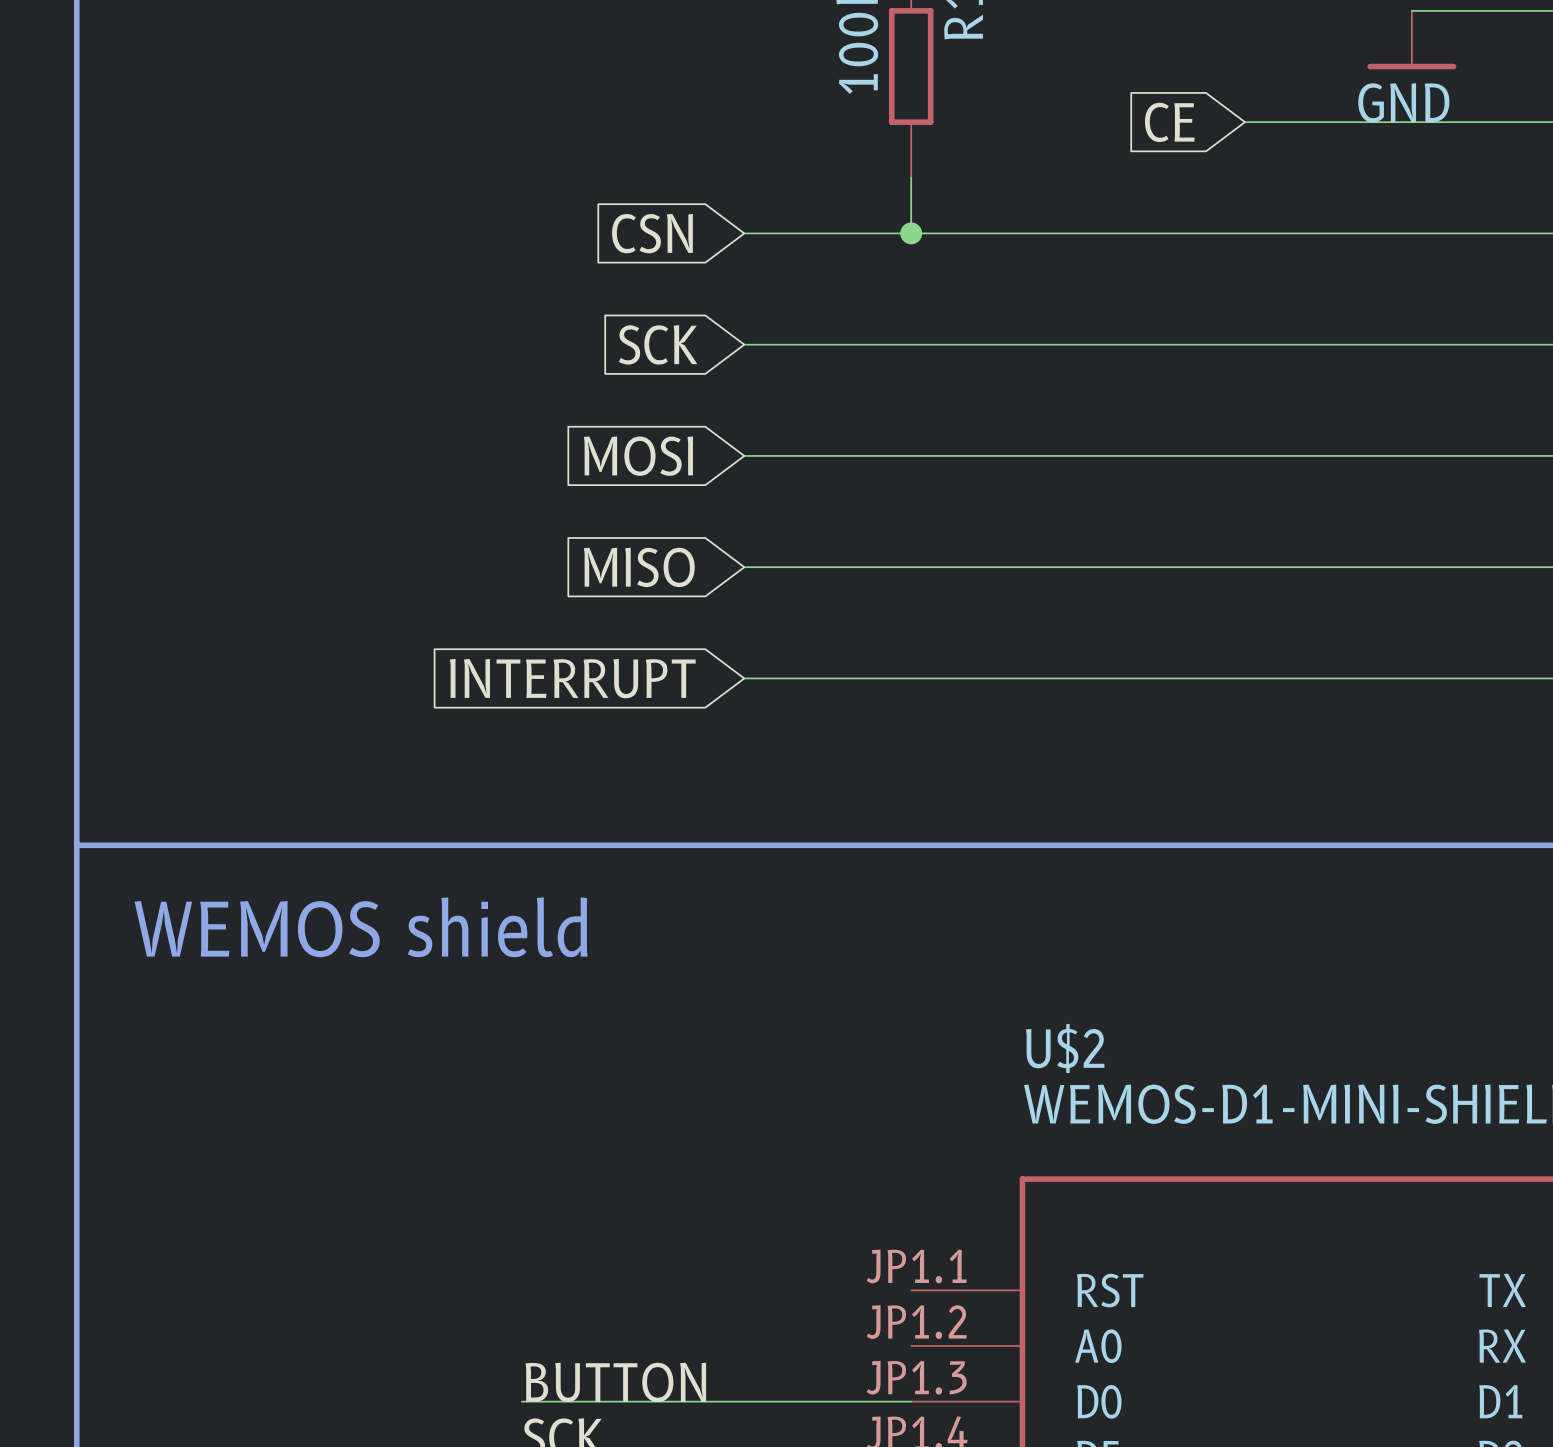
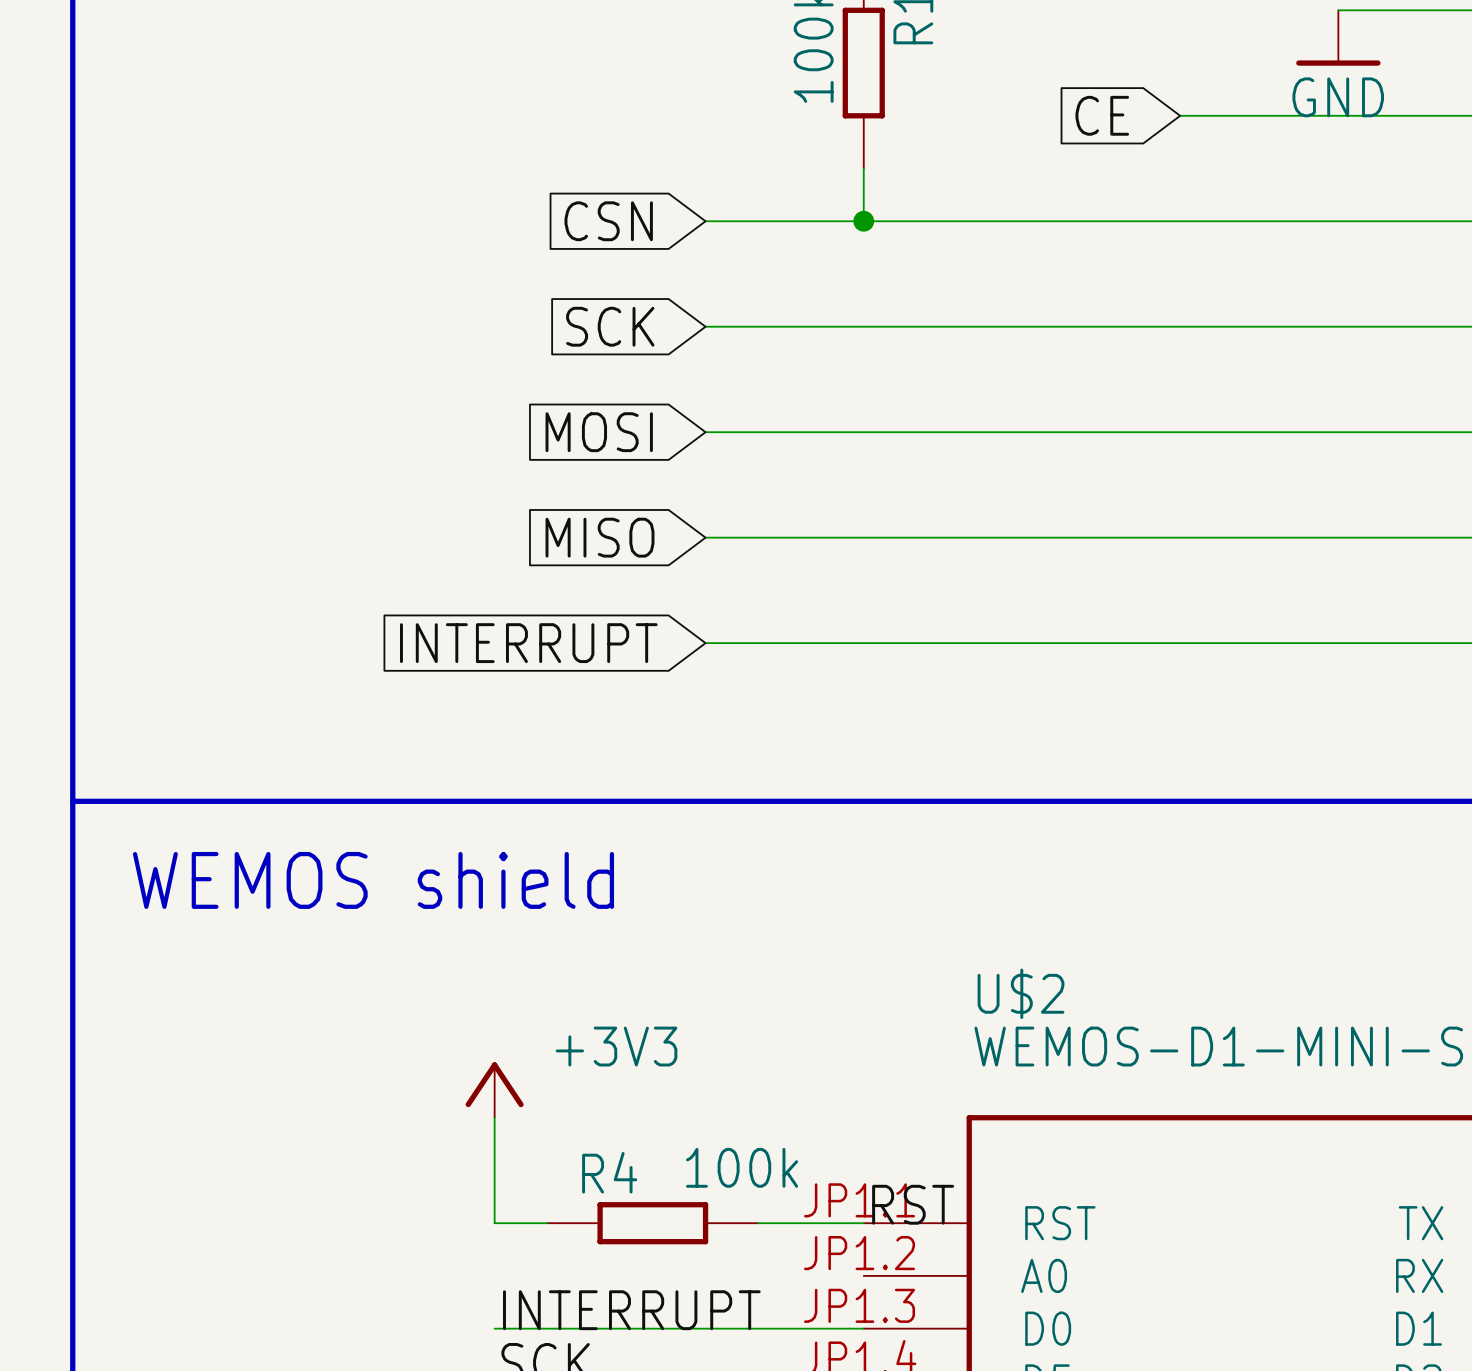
power symbol: none -> +3V3 (494, 1090)
wire: none -> (494, 1117) (494, 1223) (547, 1223)
label: none -> RST (913, 1204)
R4: none -> 100k (652, 1223)
wire: none -> (758, 1223) (863, 1223)
label: BUTTON (615, 1382) -> INTERRUPT (631, 1310)

